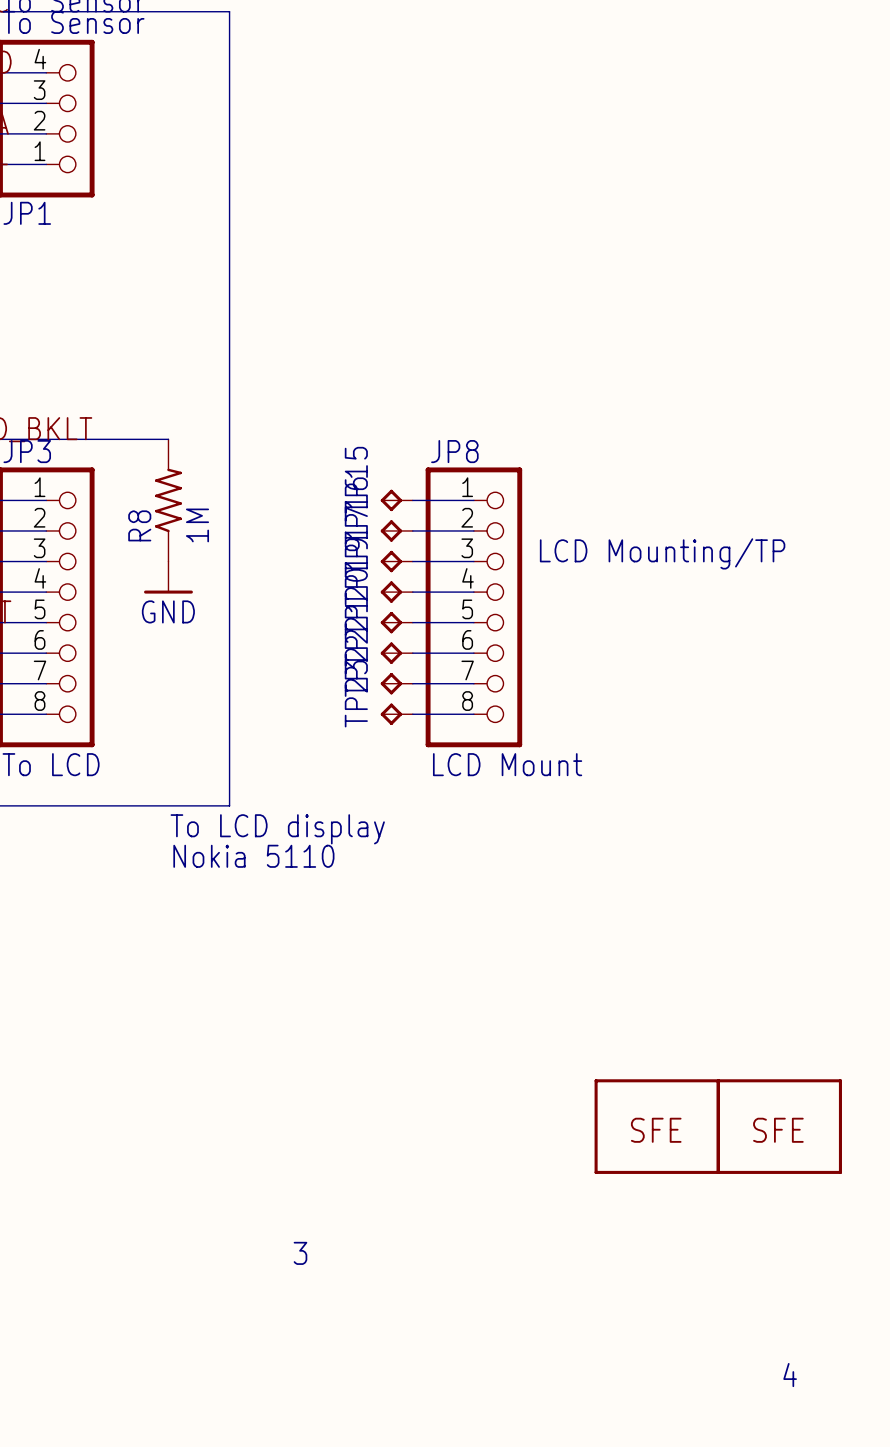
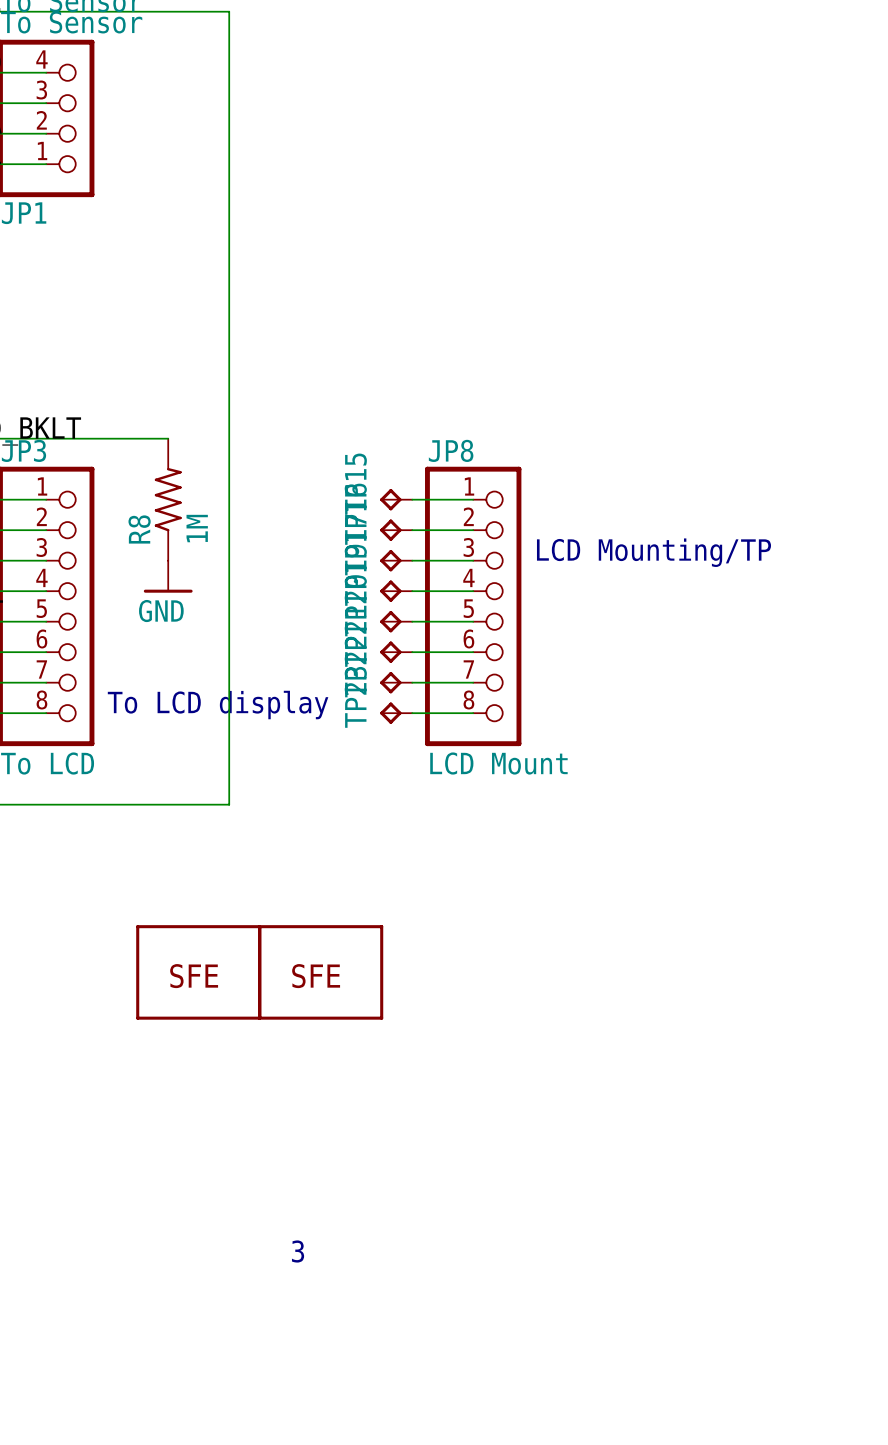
text position: To LCD display (277, 829) -> To LCD display (218, 705)
text: Nokia 5110 (253, 856) -> none
part: none -> (198, 972)
part: none -> (320, 972)
part: (657, 1126) -> none
part: (779, 1126) -> none
text: 4 (790, 1375) -> none

